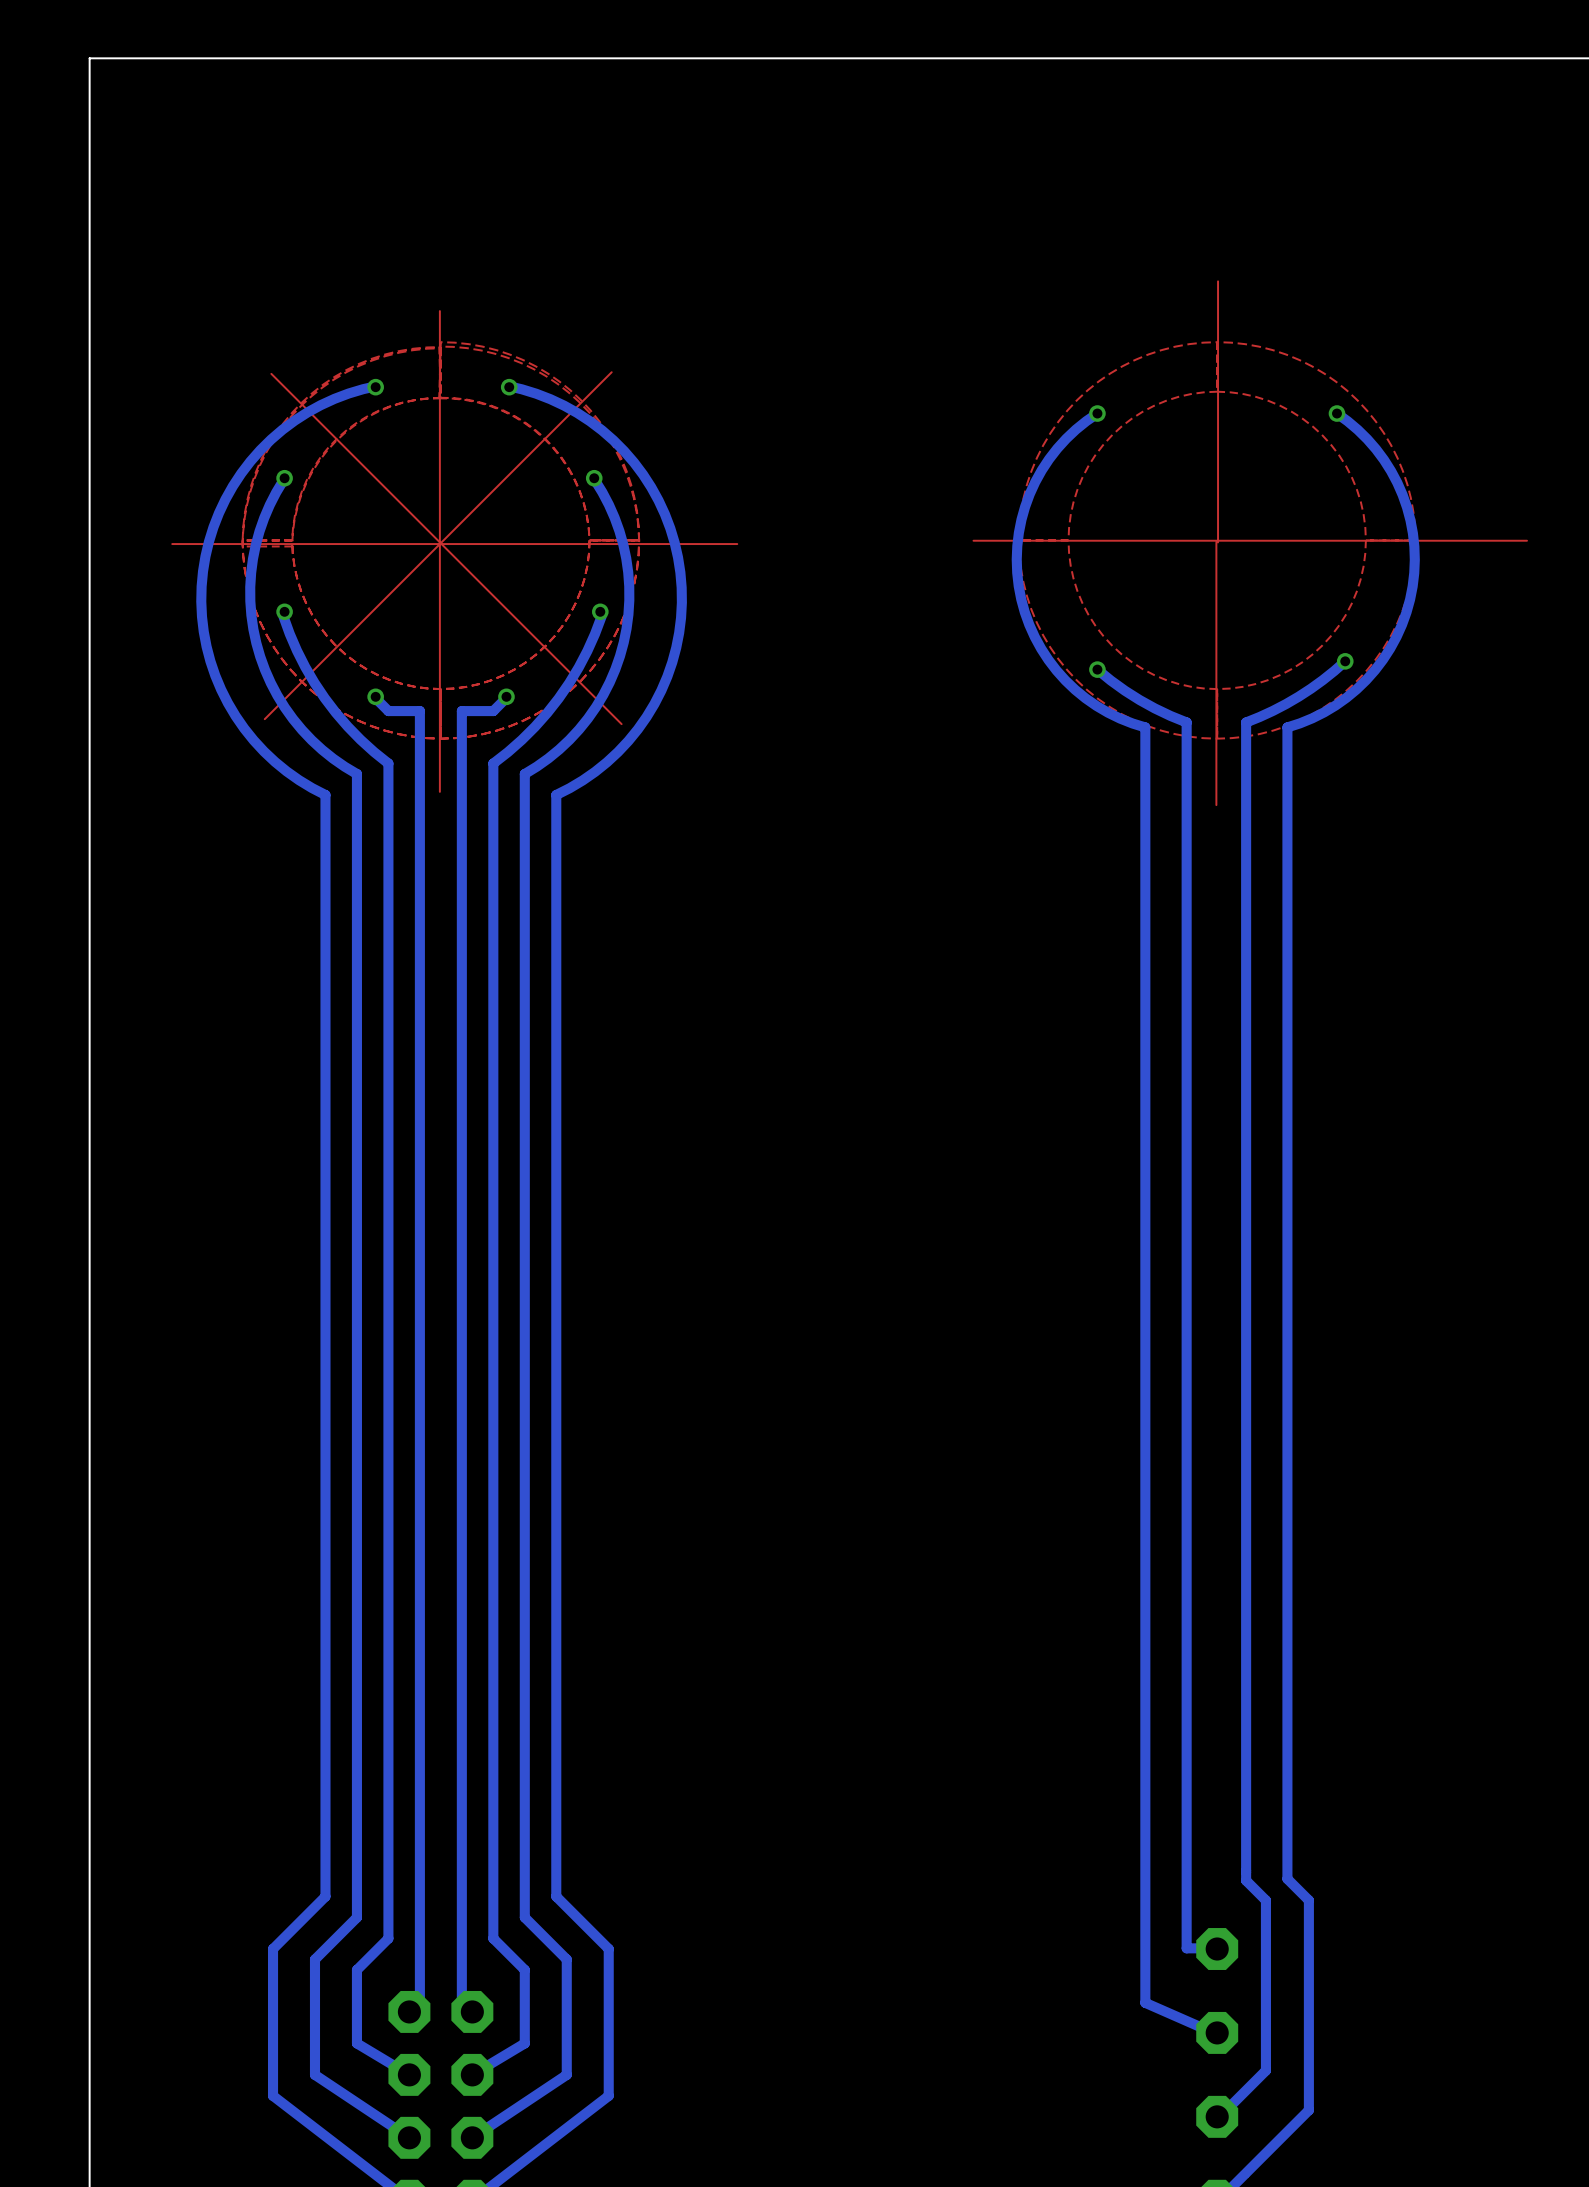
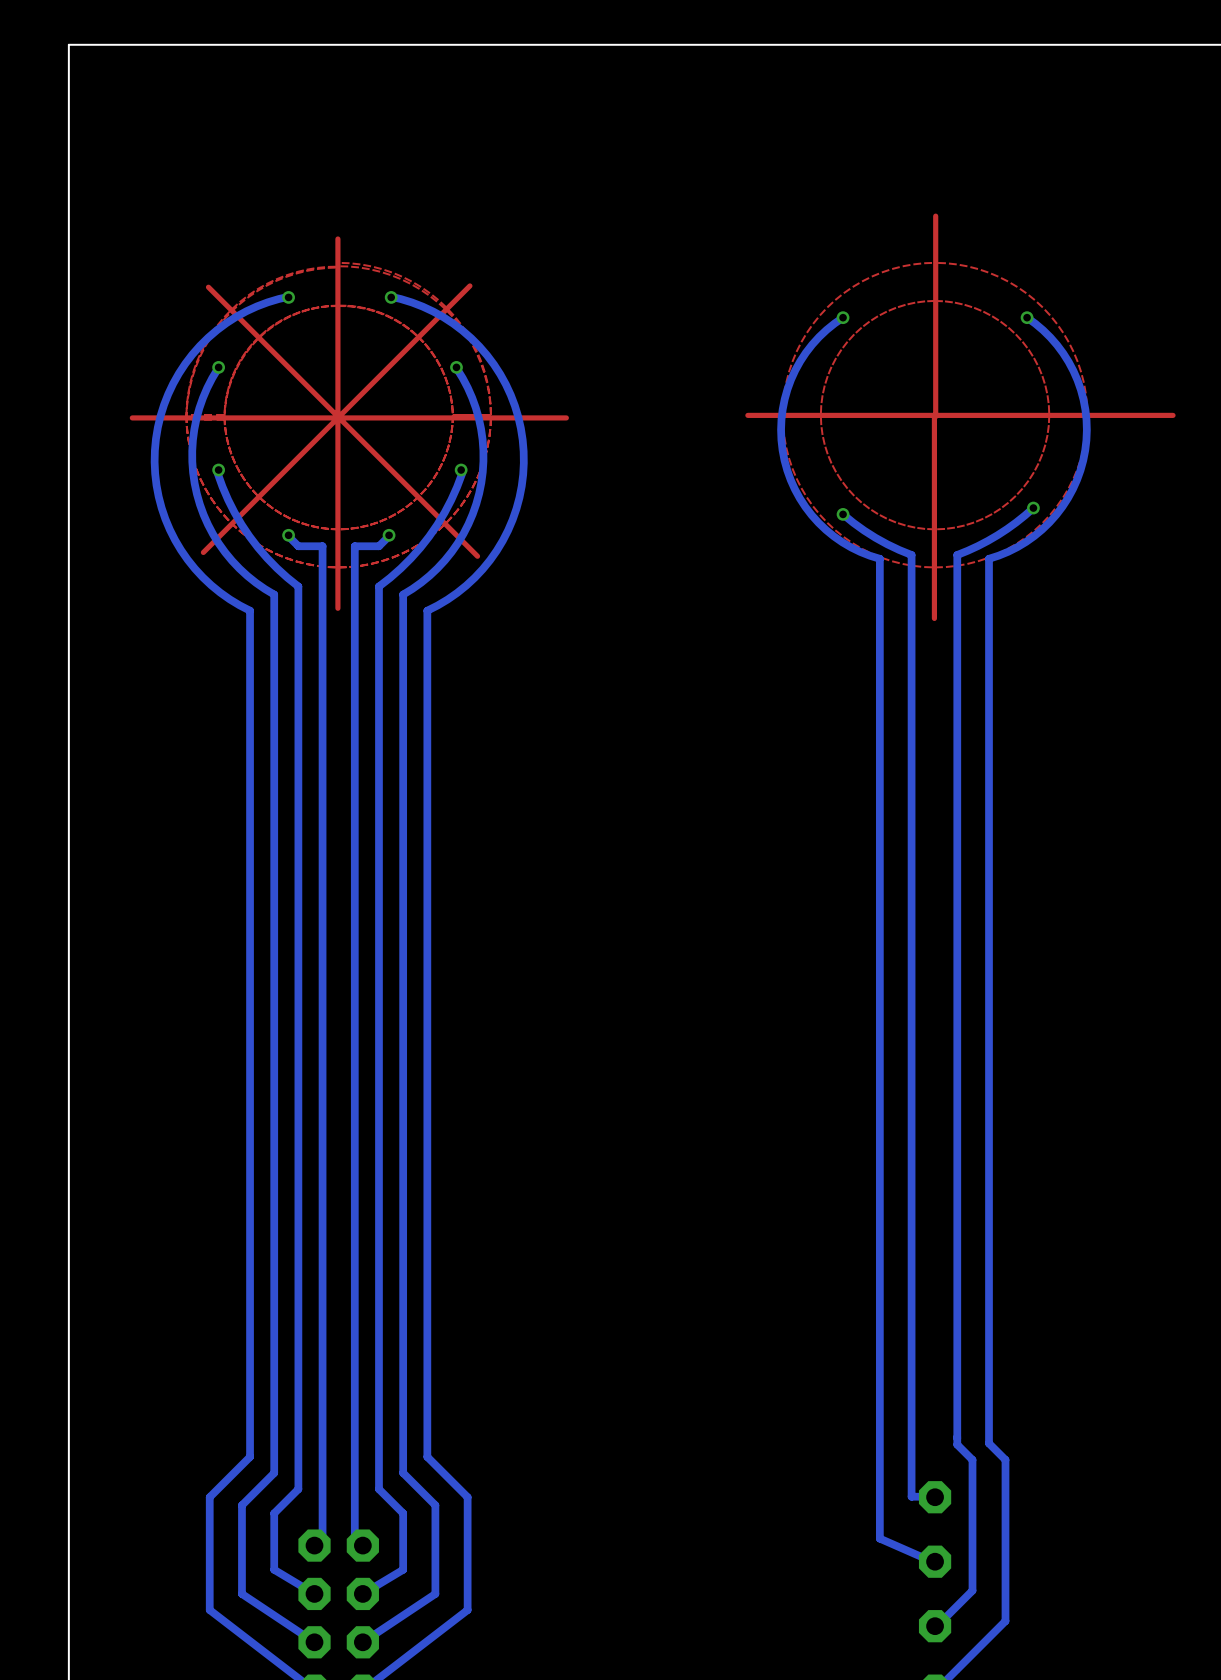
top track width: thin (1218, 281) (1218, 542) -> thick (935, 216) (935, 416)
top track width: thin (439, 311) (439, 791) -> thick (337, 238) (337, 608)
top track width: thin (611, 372) (264, 719) -> thick (469, 285) (203, 552)
top track width: thin (271, 373) (621, 724) -> thick (208, 287) (477, 556)
top track width: thin (1526, 540) (973, 540) -> thick (1173, 415) (747, 415)
top track width: thin (1216, 542) (1216, 805) -> thick (934, 416) (934, 618)
top track width: thin (737, 544) (172, 544) -> thick (566, 417) (132, 417)

